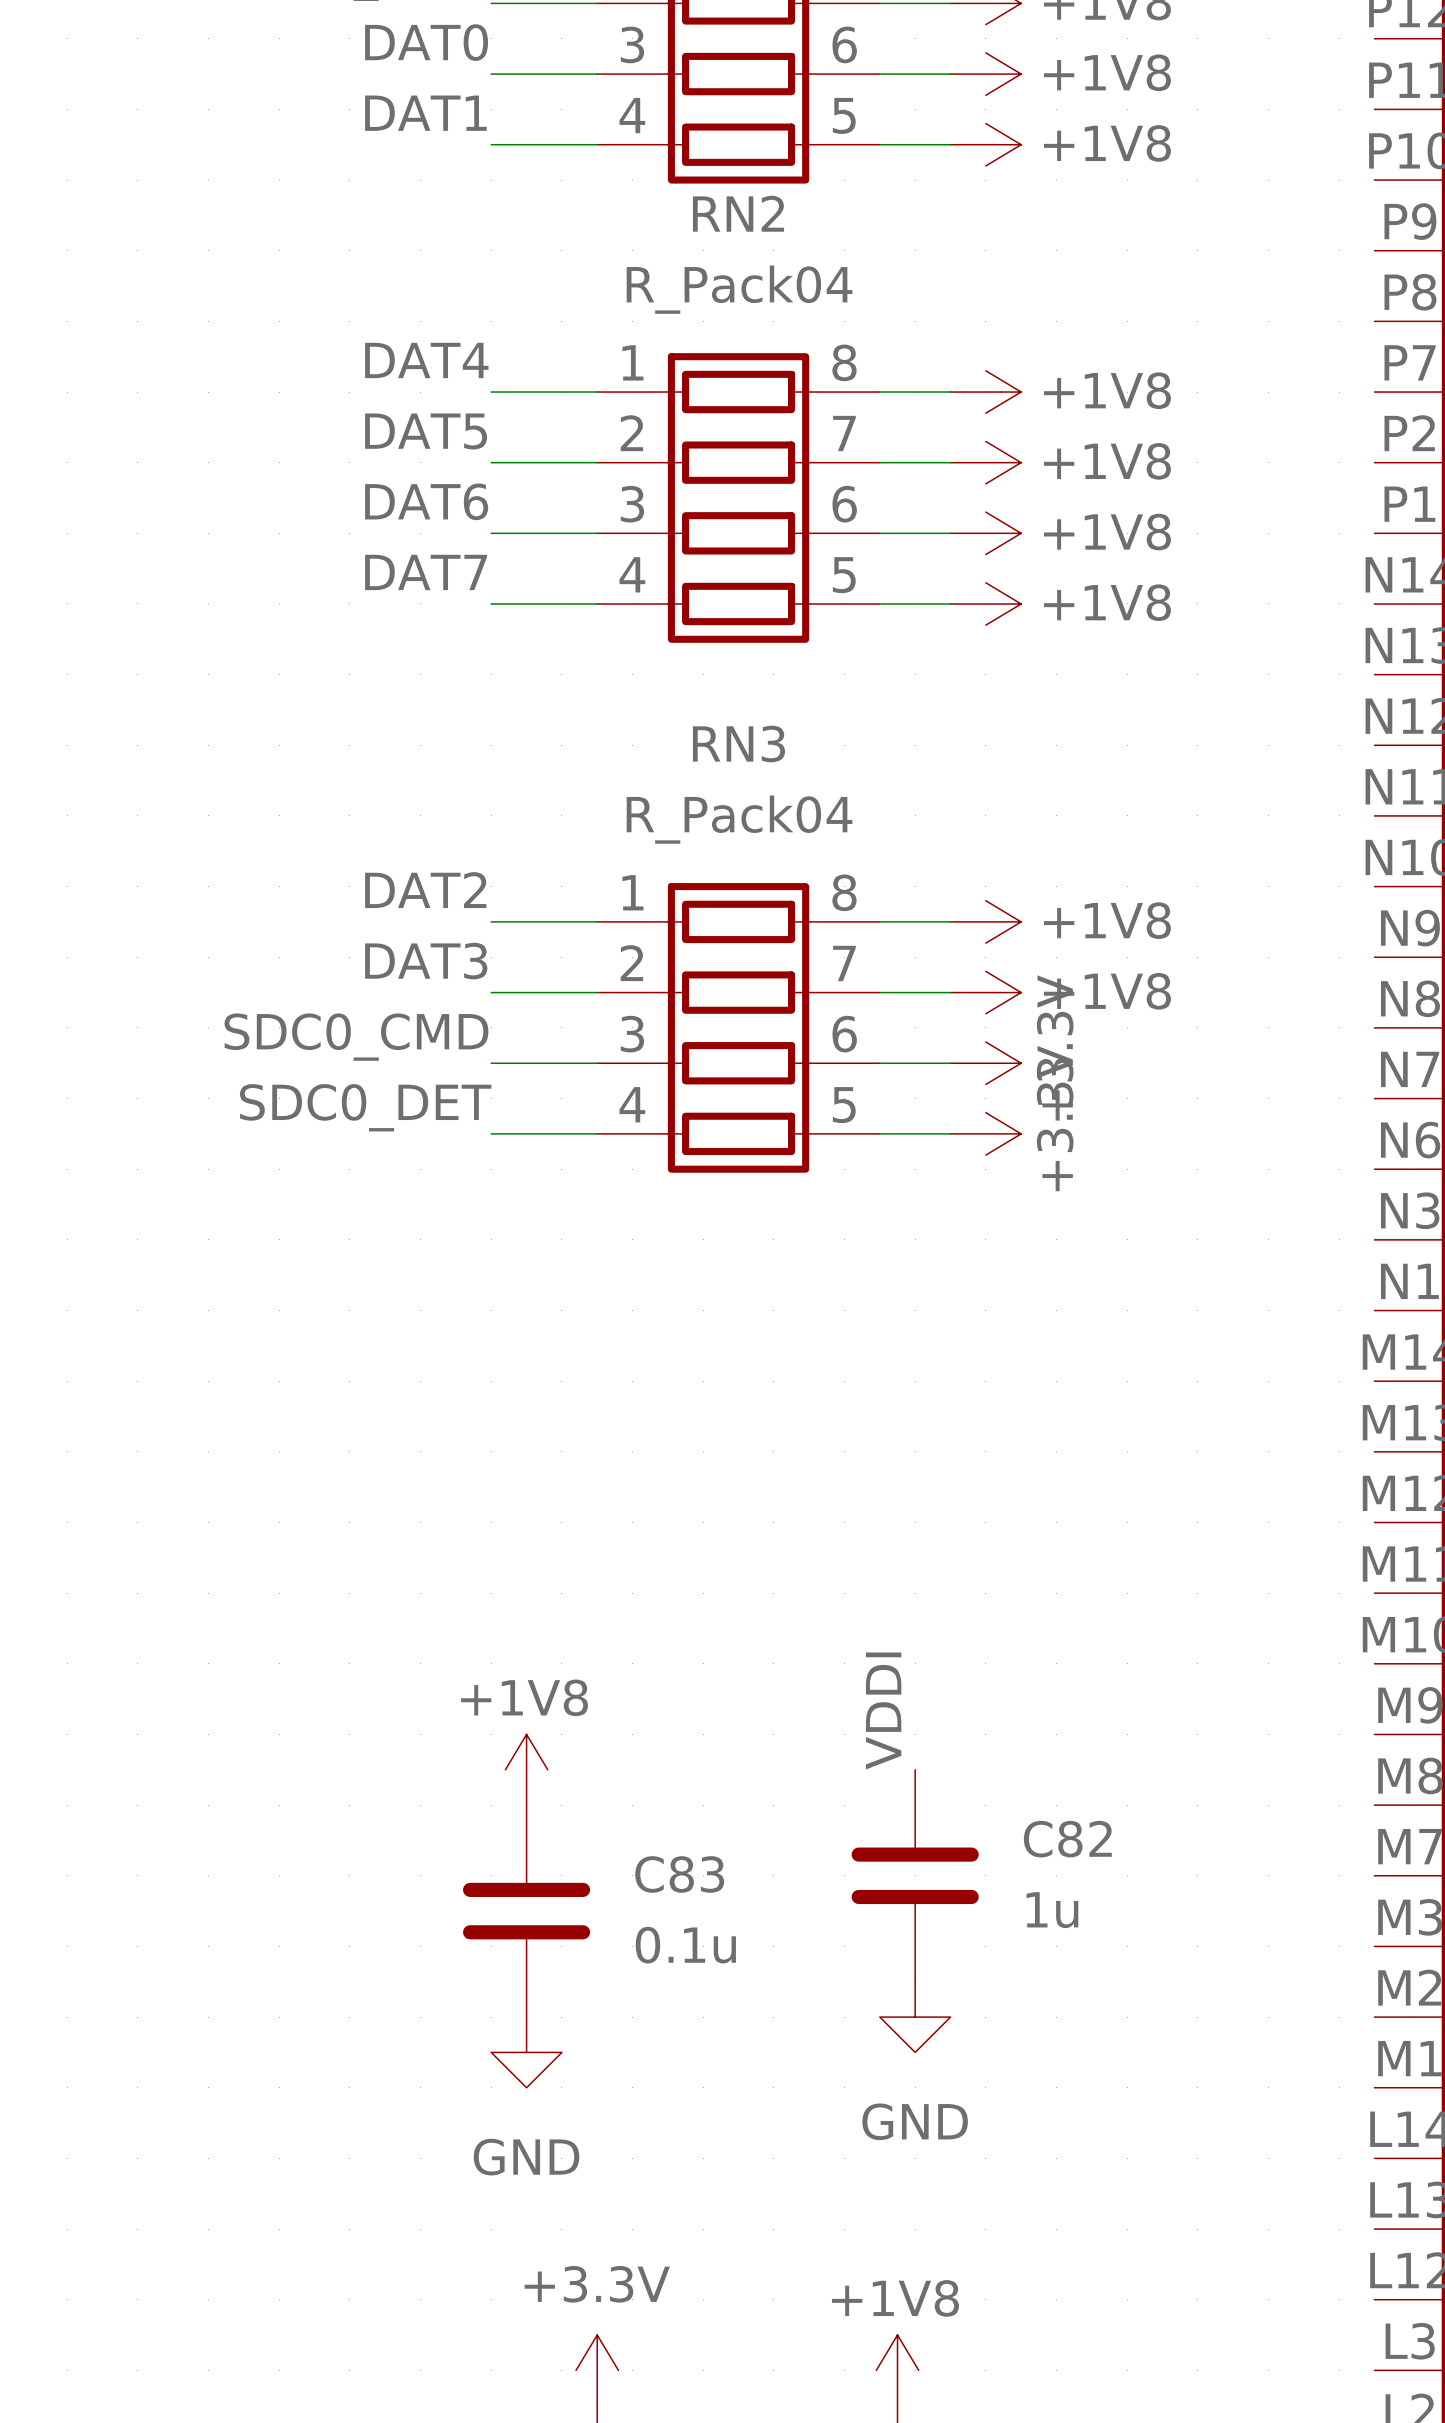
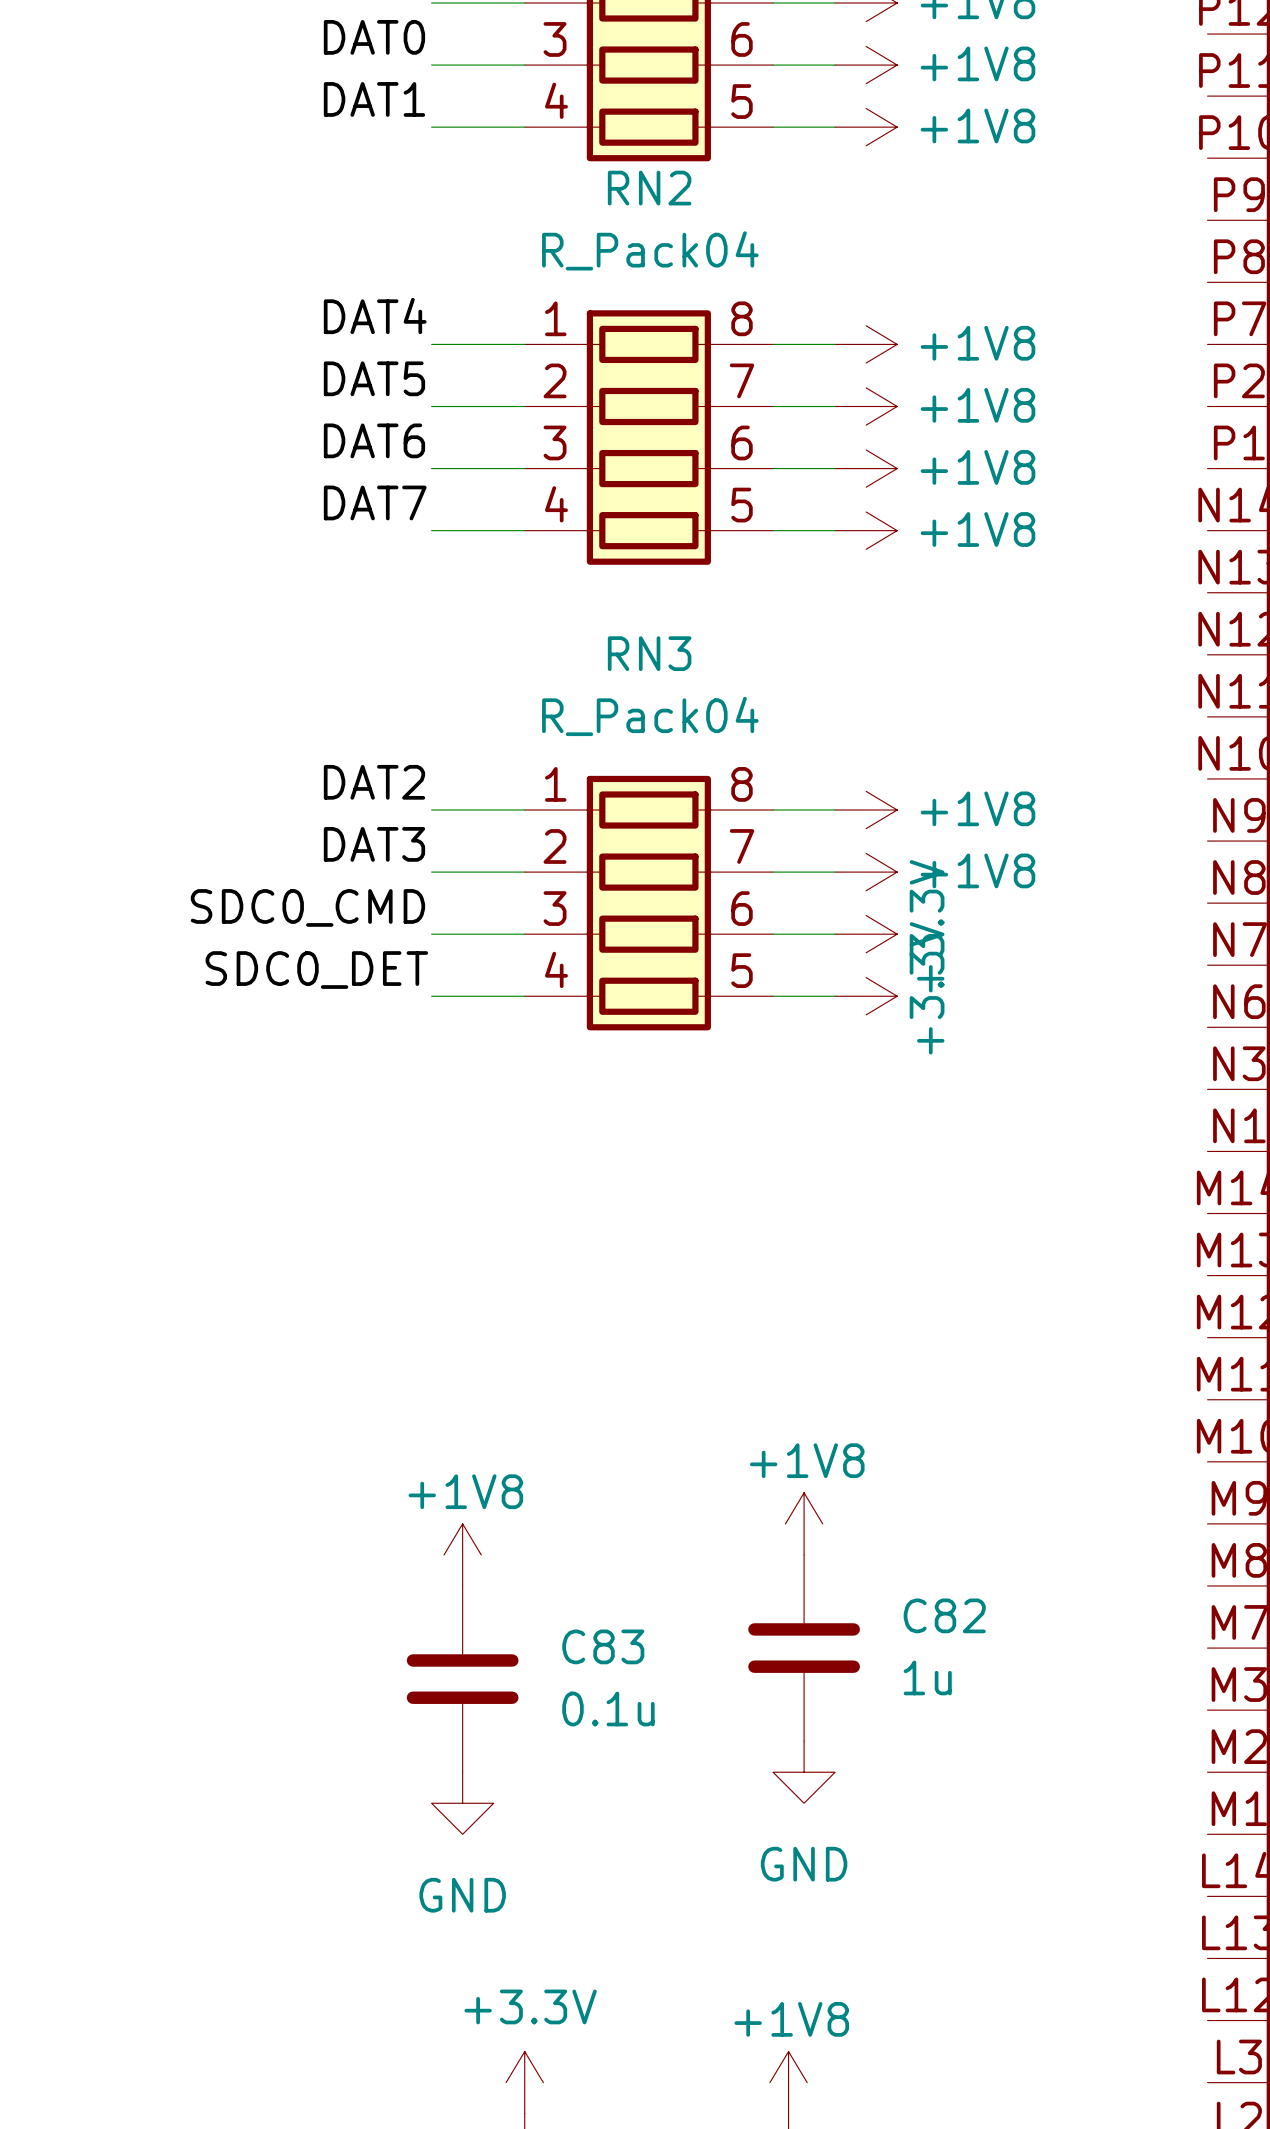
label: VDDI (883, 1710) -> none
power symbol: none -> +1V8 (804, 1523)

